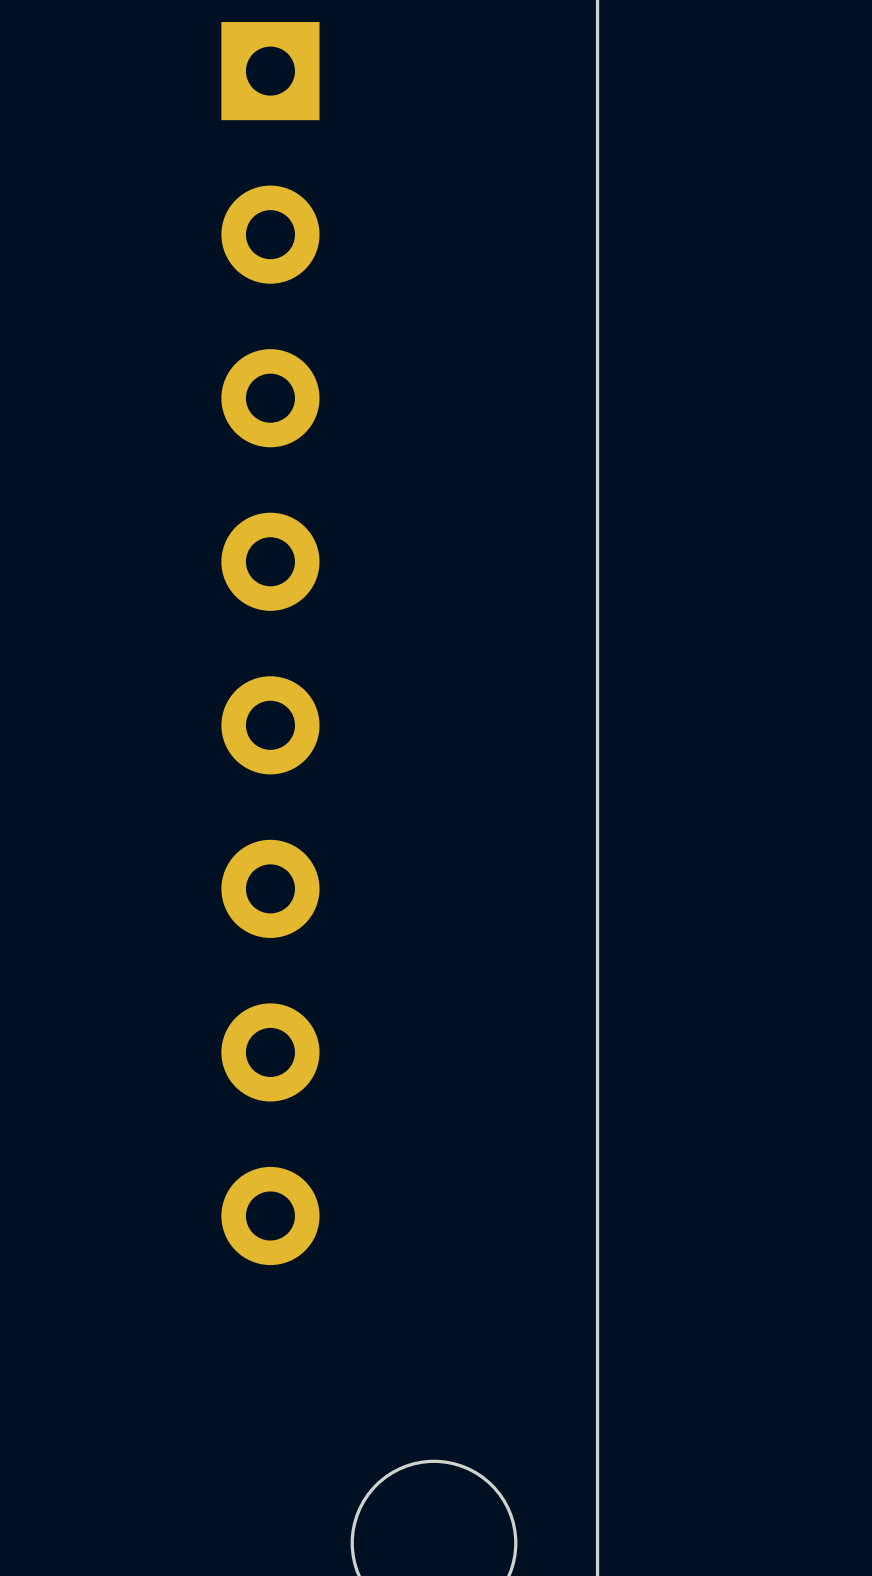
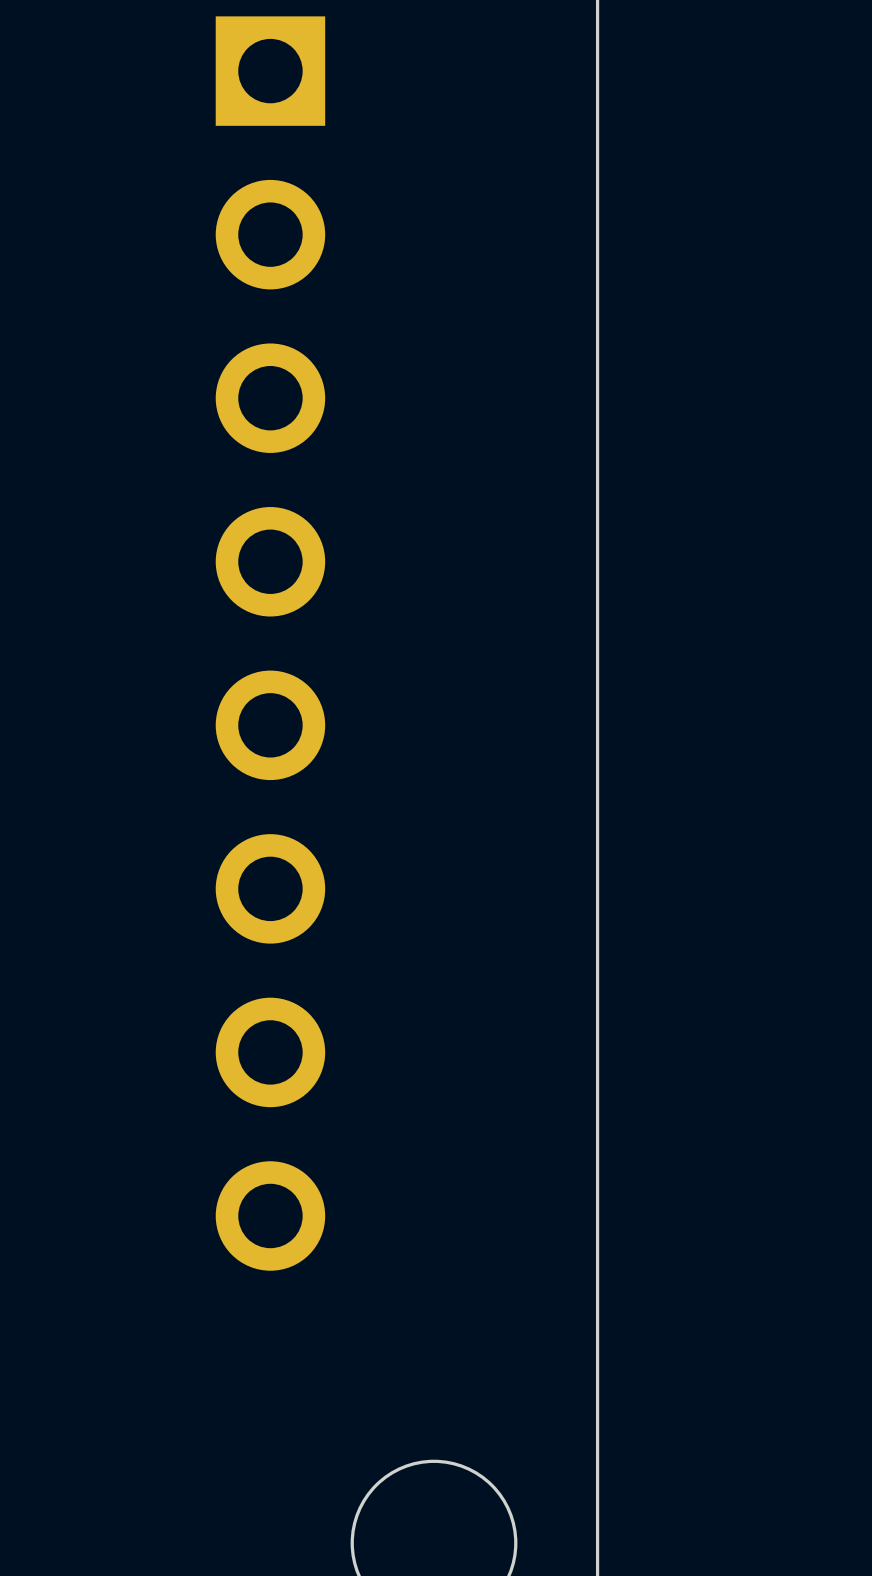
part footprint: [221, 22, 320, 1266] -> [215, 16, 326, 1271]

